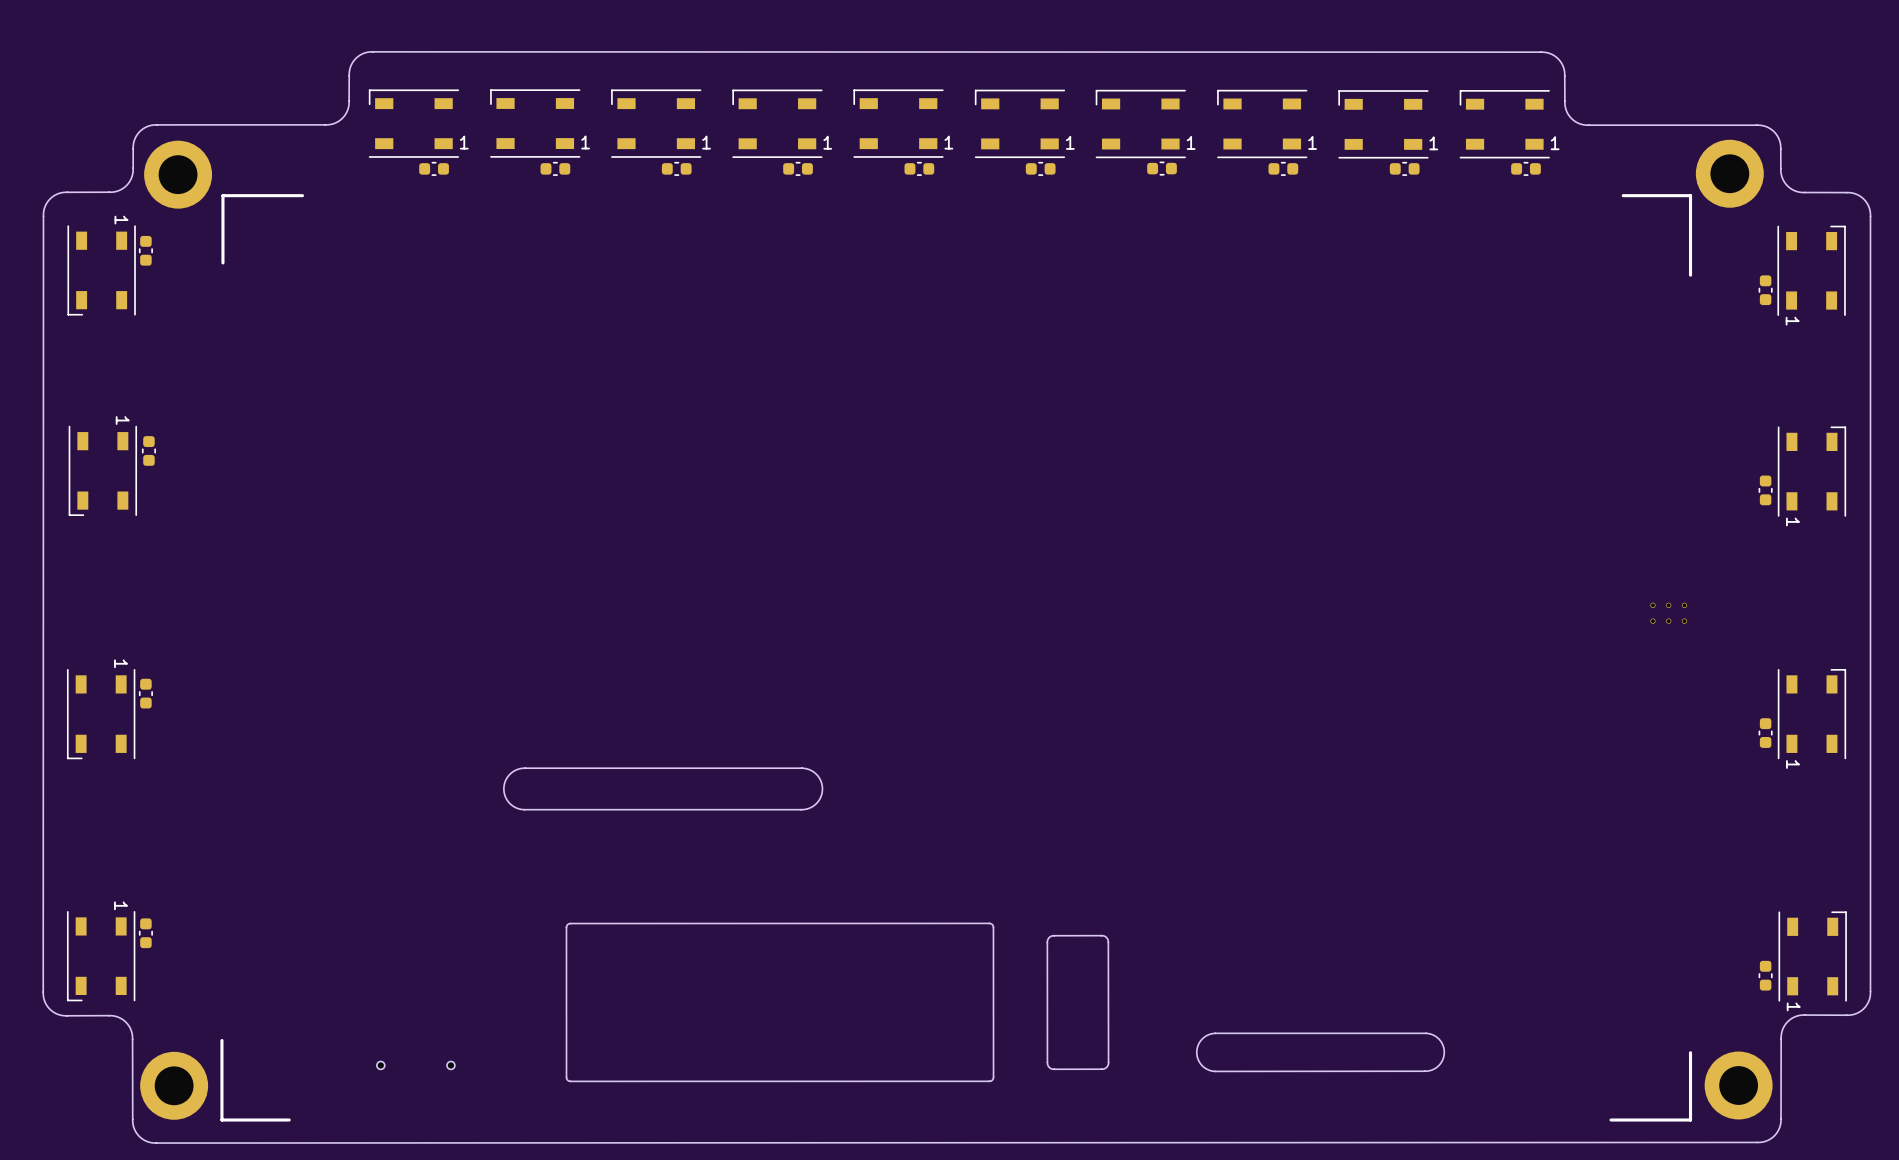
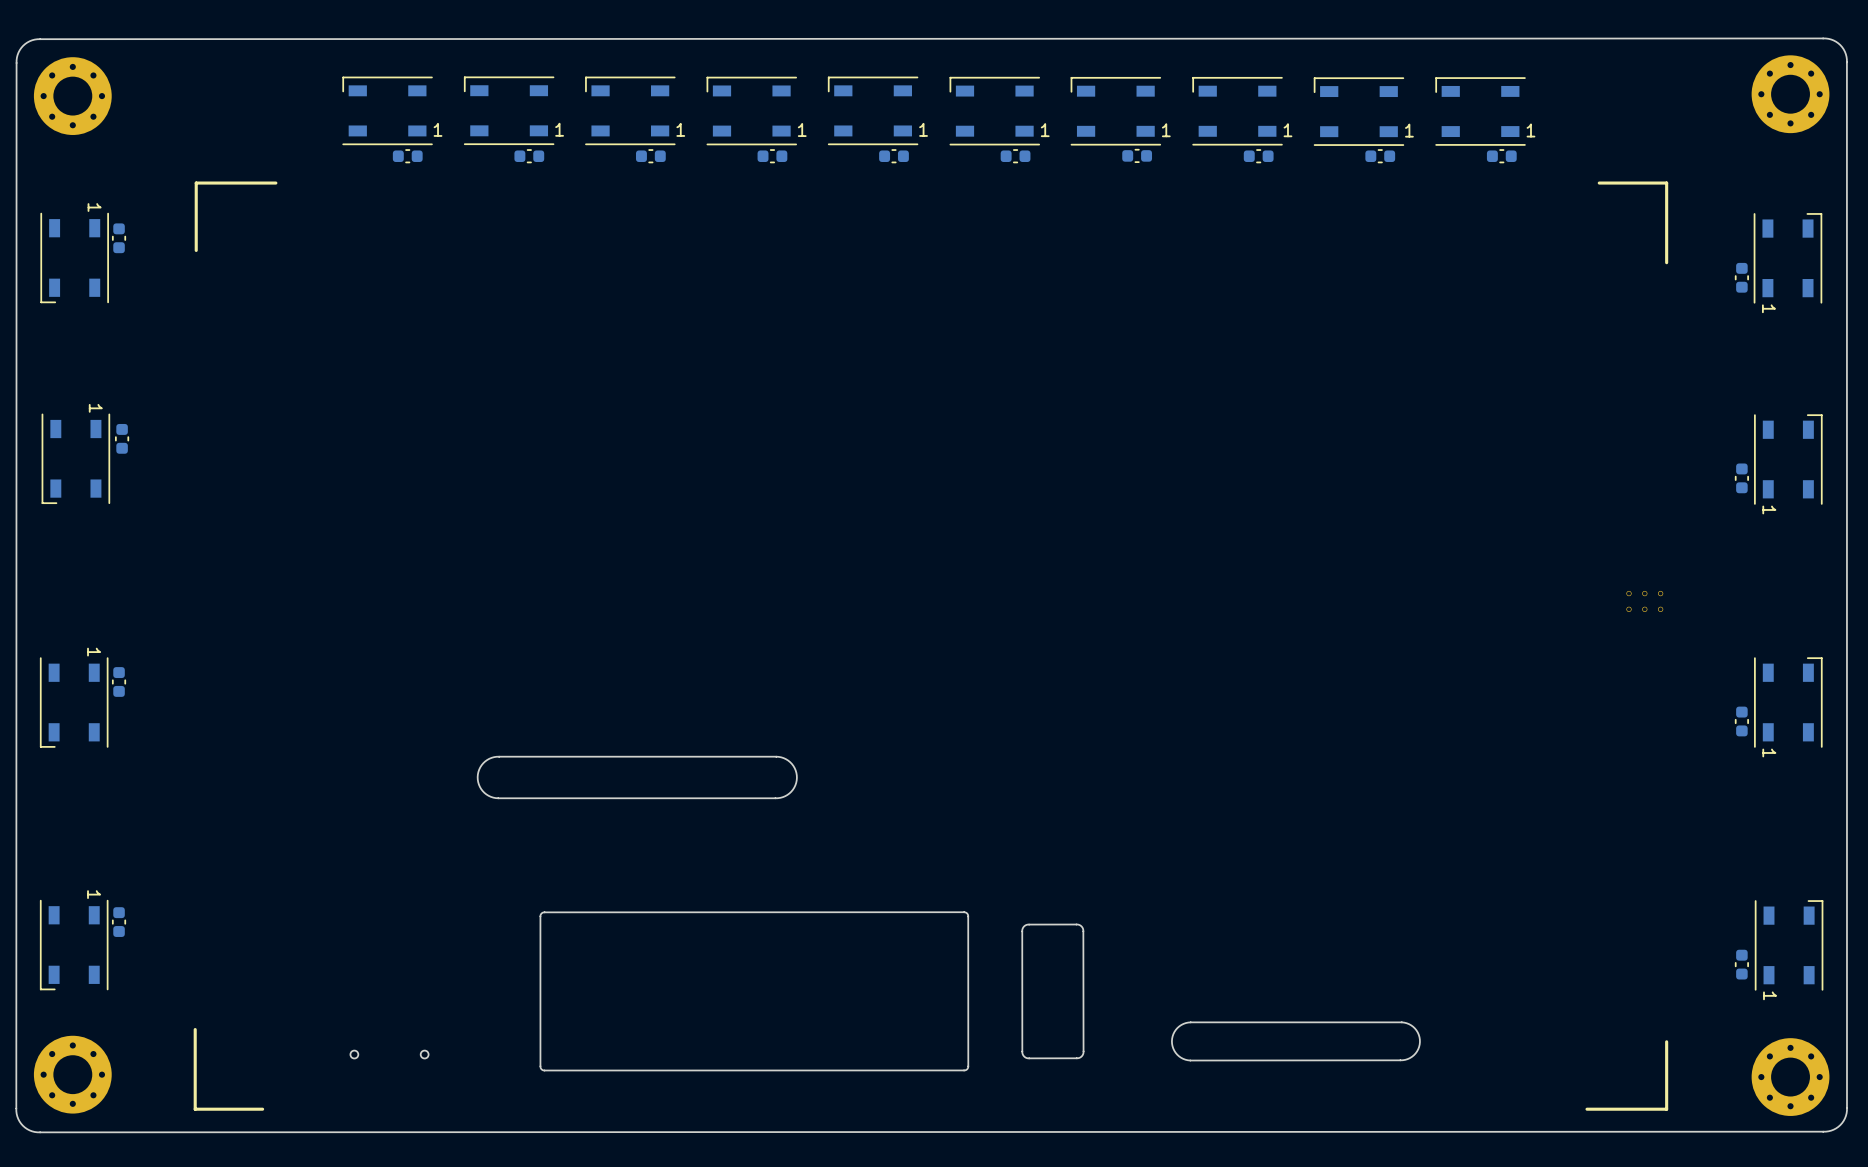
part: none -> (1790, 94)
part: none -> (72, 96)
part: (1729, 173) -> none
part: (178, 174) -> none
part: none -> (72, 1074)
part: (174, 1085) -> none
part: (1738, 1085) -> none
part: none -> (1790, 1077)
board edge: (1757, 1142) (1772, 1137) (1780, 1124) (1781, 1036) (1785, 1023) (1799, 1015) (1854, 1014) (1865, 1006) (1870, 994) (1870, 213) (1868, 205) (1861, 197) (1851, 192) (1802, 192) (1789, 187) (1781, 173) (1778, 138) (1774, 131) (1764, 126) (1586, 125) (1578, 123) (1571, 118) (1565, 109) (1562, 65) (1553, 55) (1543, 52) (373, 51) (360, 55) (352, 62) (349, 73) (348, 108) (344, 116) (335, 122) (327, 124) (149, 125) (141, 129) (135, 138) (132, 173) (124, 187) (111, 192) (59, 193) (48, 200) (43, 210) (43, 994) (48, 1007) (58, 1014) (114, 1016) (127, 1024) (132, 1036) (133, 1124) (141, 1138) (156, 1143) -> (1733, 1131) (1828, 1131) (1840, 1125) (1846, 1110) (1846, 59) (1840, 45) (1825, 38) (40, 39) (27, 42) (19, 50) (16, 60) (16, 1111) (22, 1125) (34, 1131) (129, 1132)

